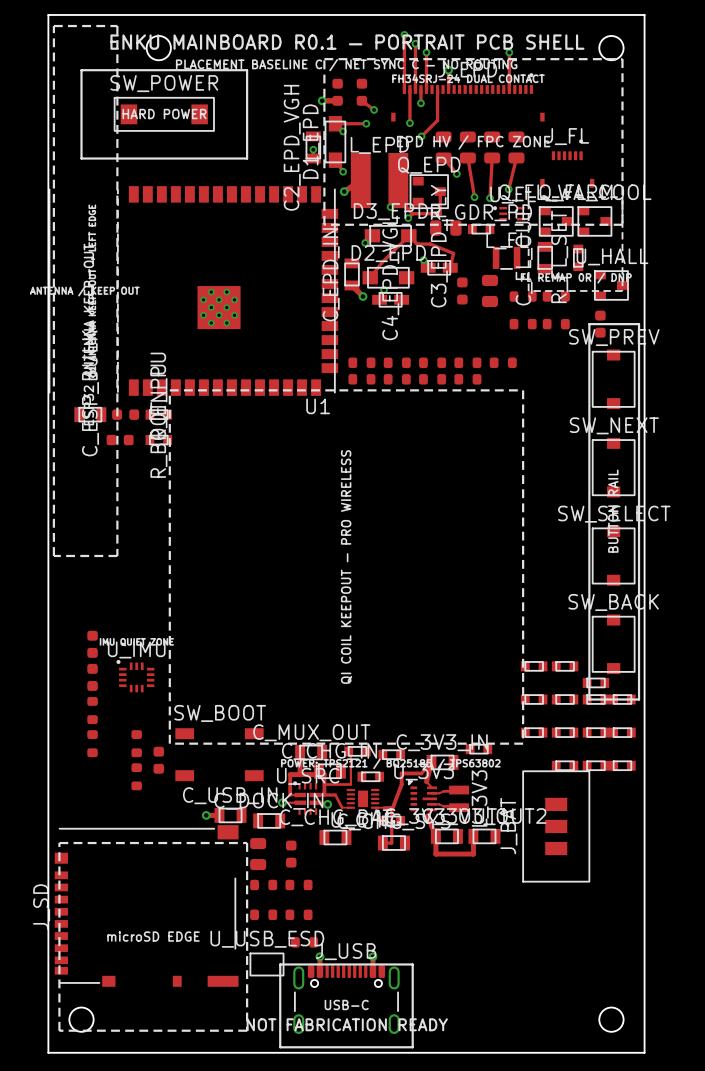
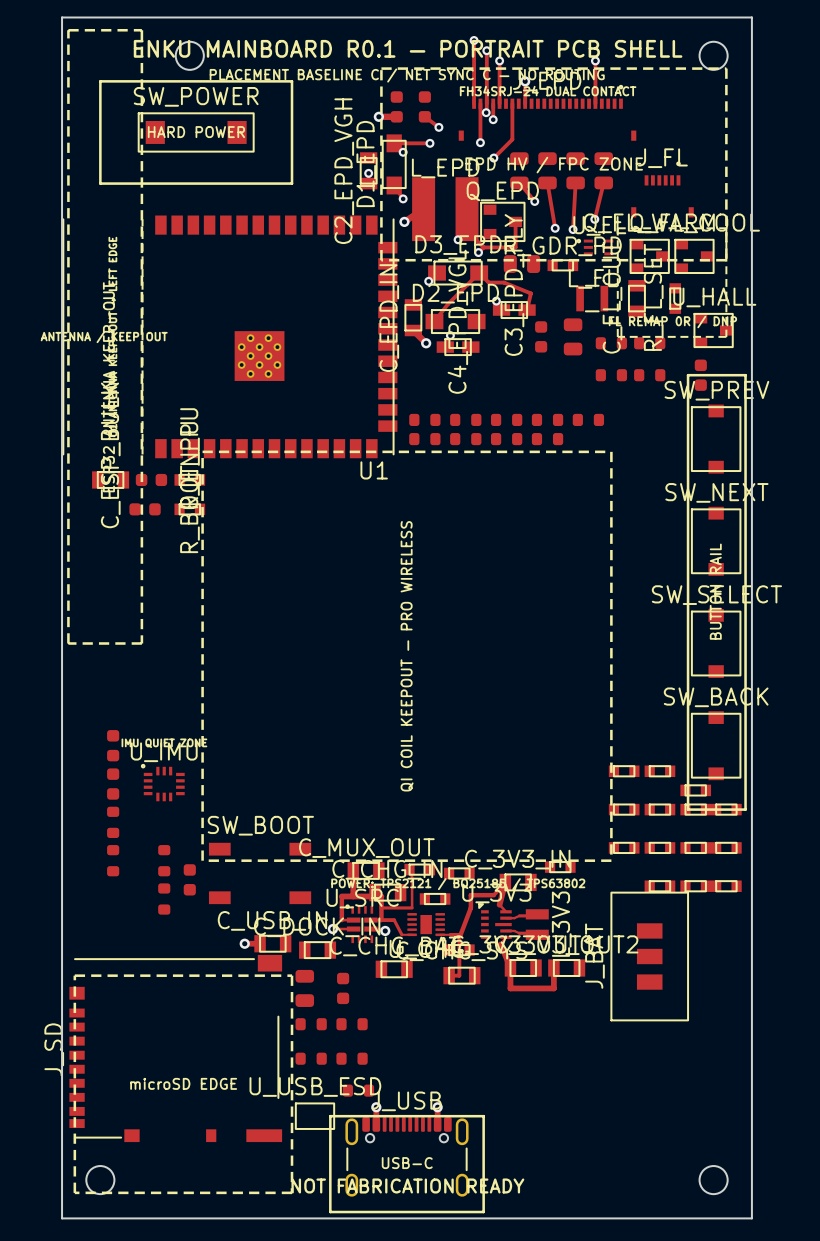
via: none -> (486, 112)

